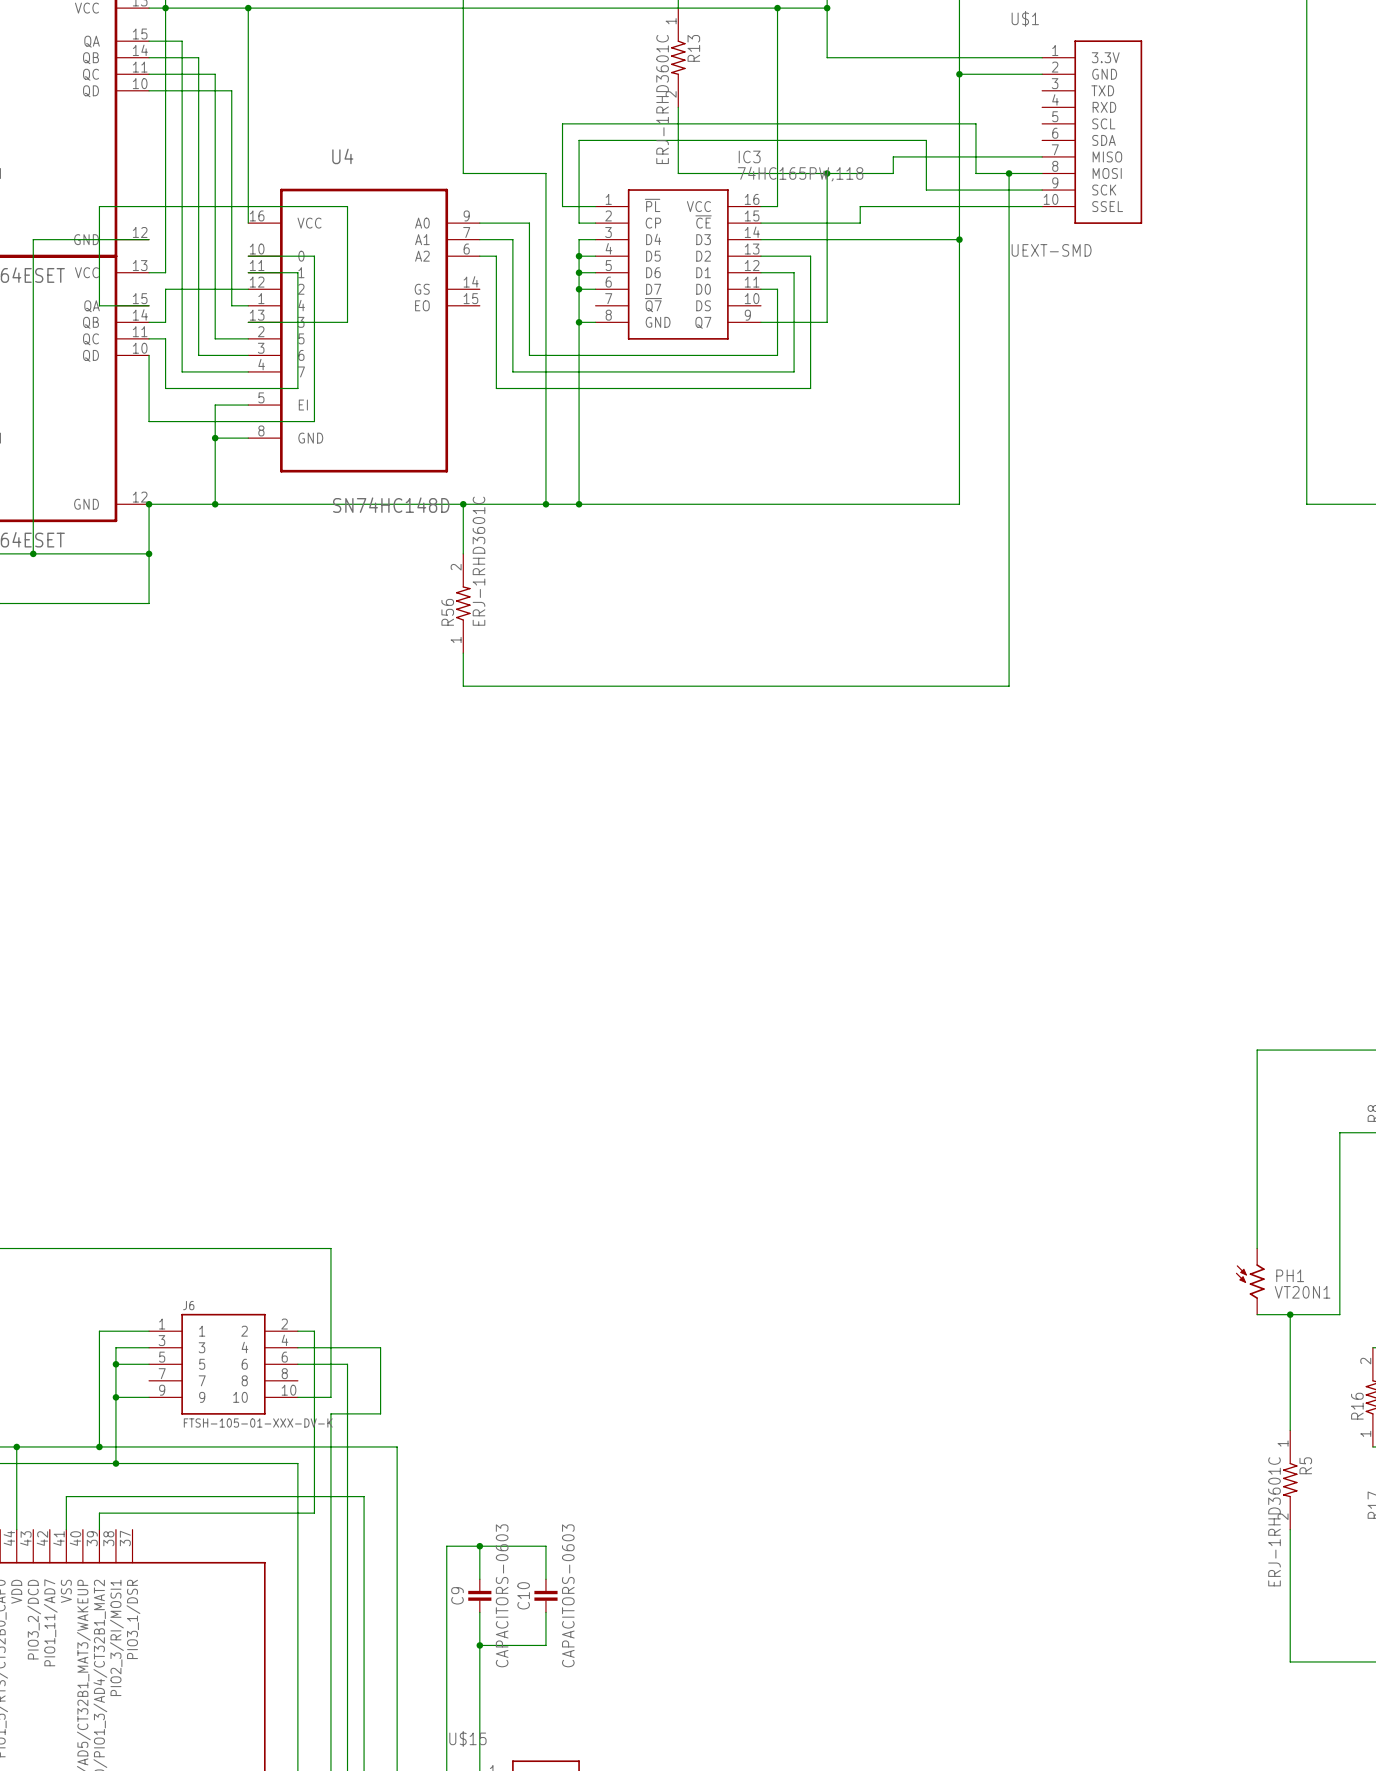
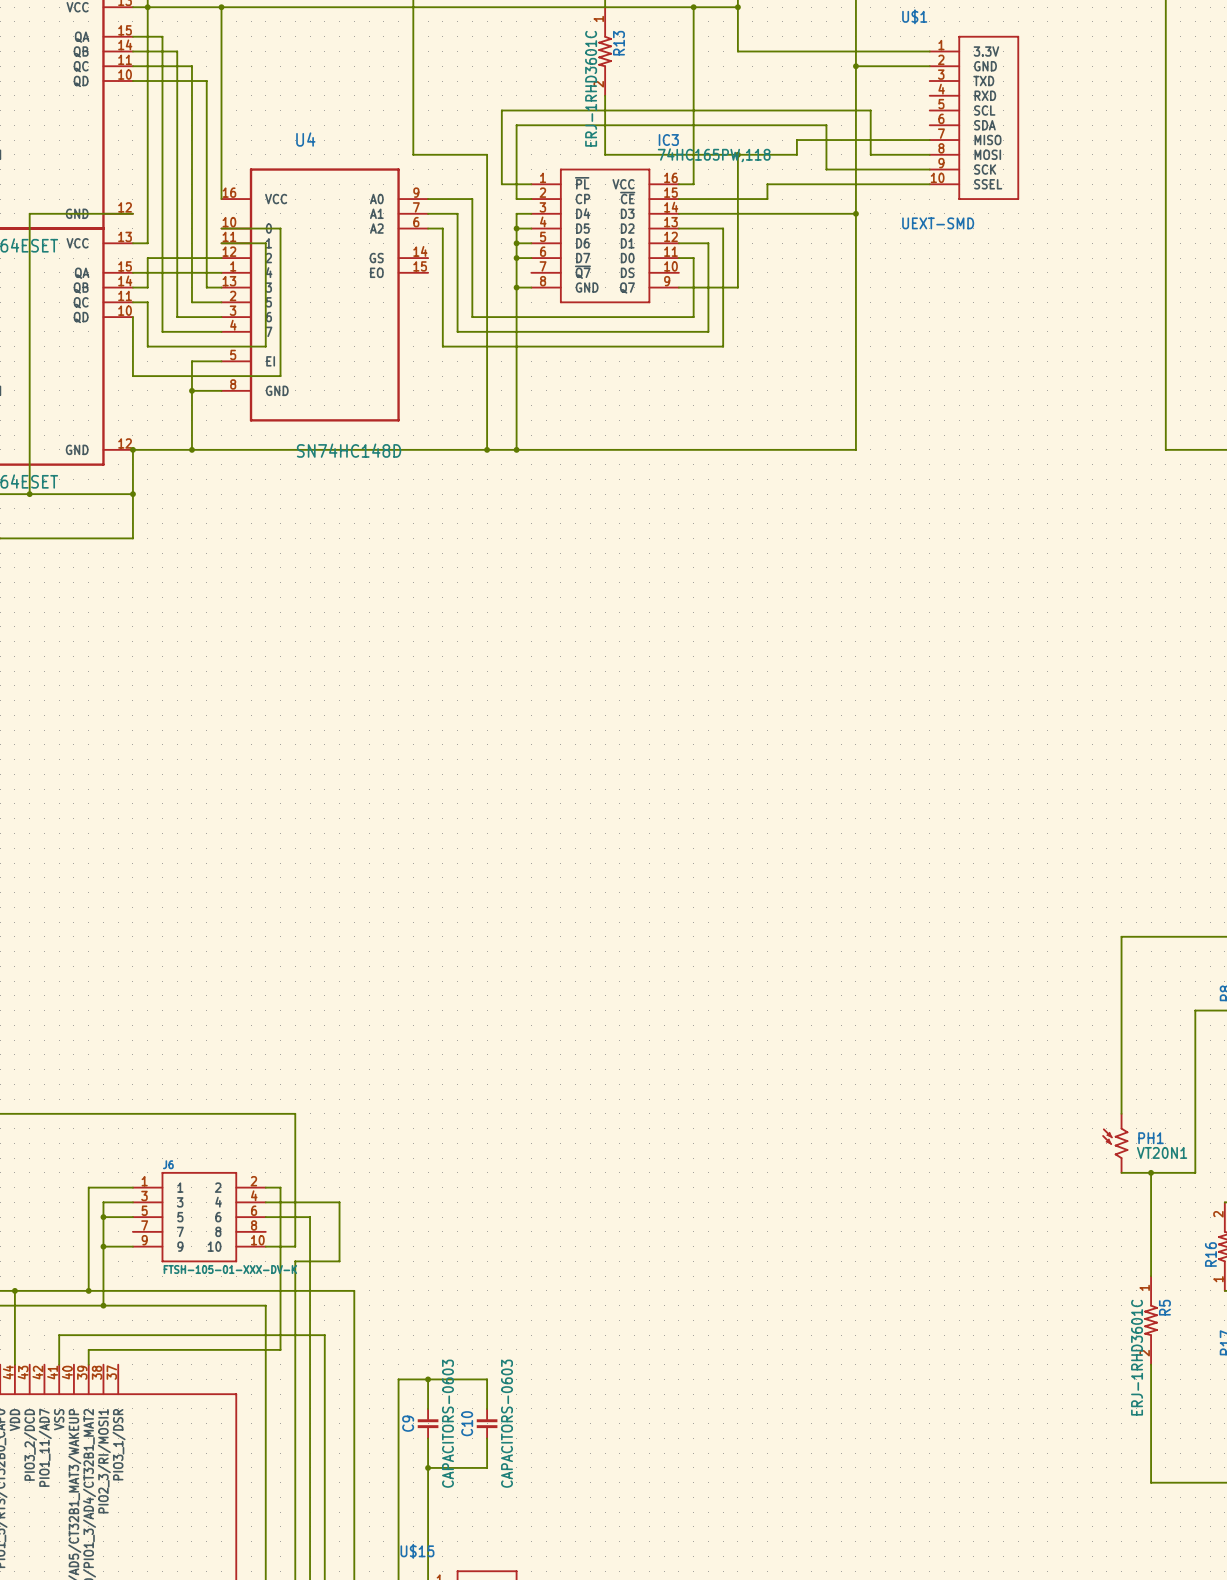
wire: (1009, 173) (1009, 686) (463, 686) (463, 653) -> none
junction: (1009, 173) -> none
wire: (149, 305) (99, 305) (99, 206) (347, 206) (347, 322) (248, 322) -> (132, 272) (206, 272) (206, 287) (221, 287)
wire: (463, 504) (463, 553) -> none
junction: (463, 504) -> none
R56: ERJ-1RHD3601C (463, 603) -> none

